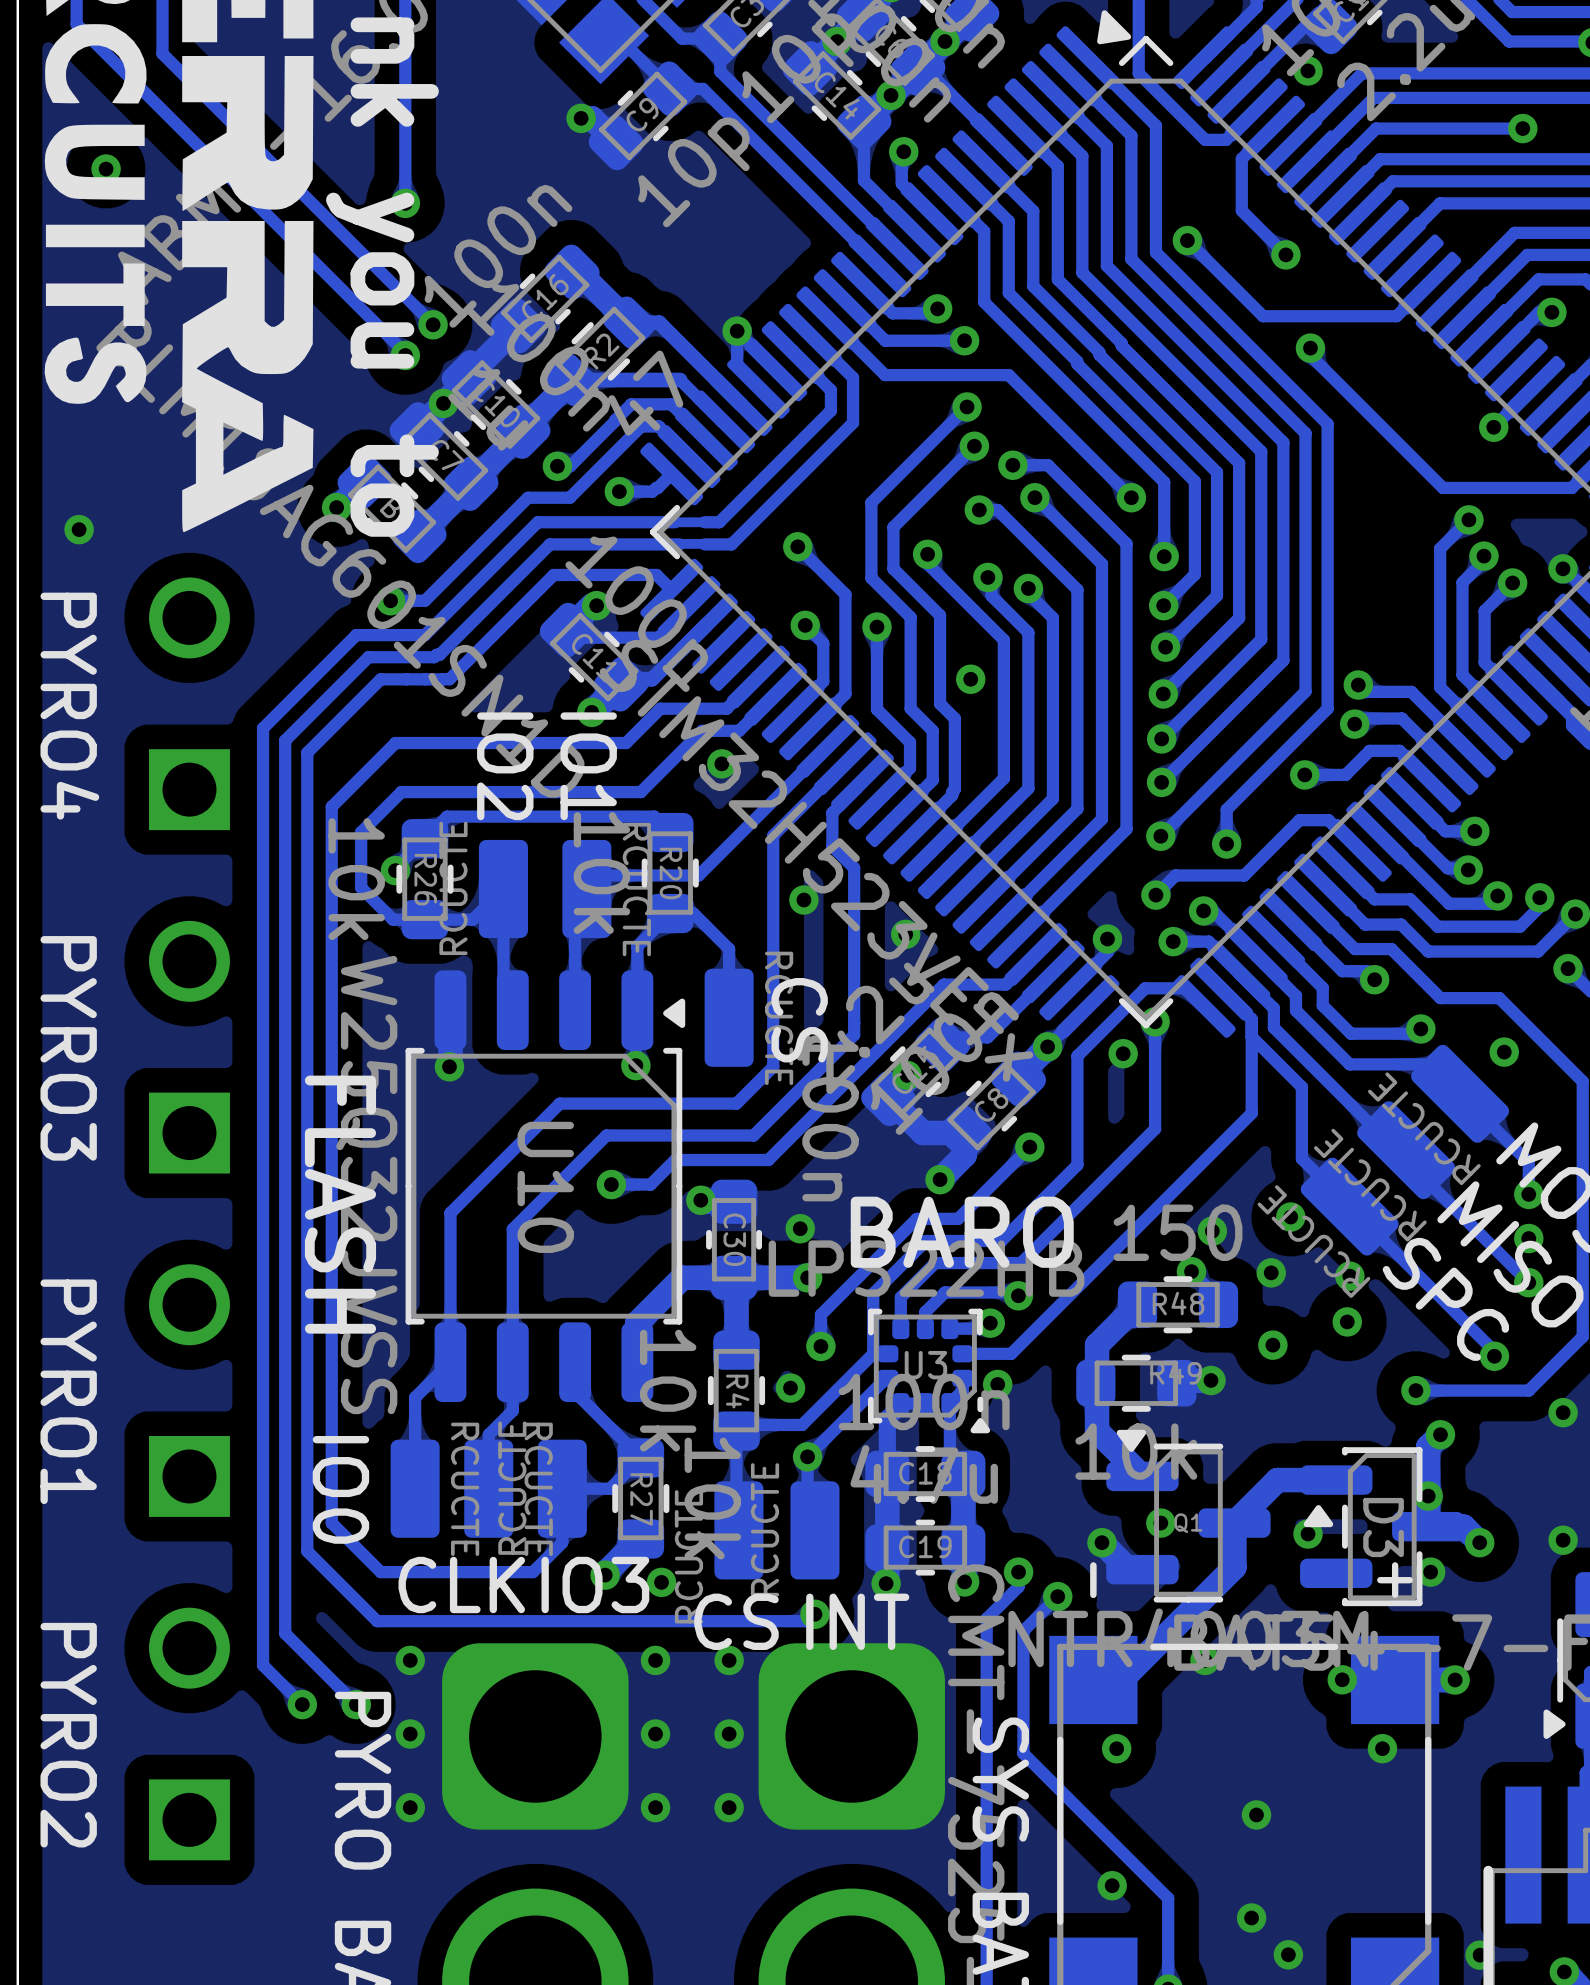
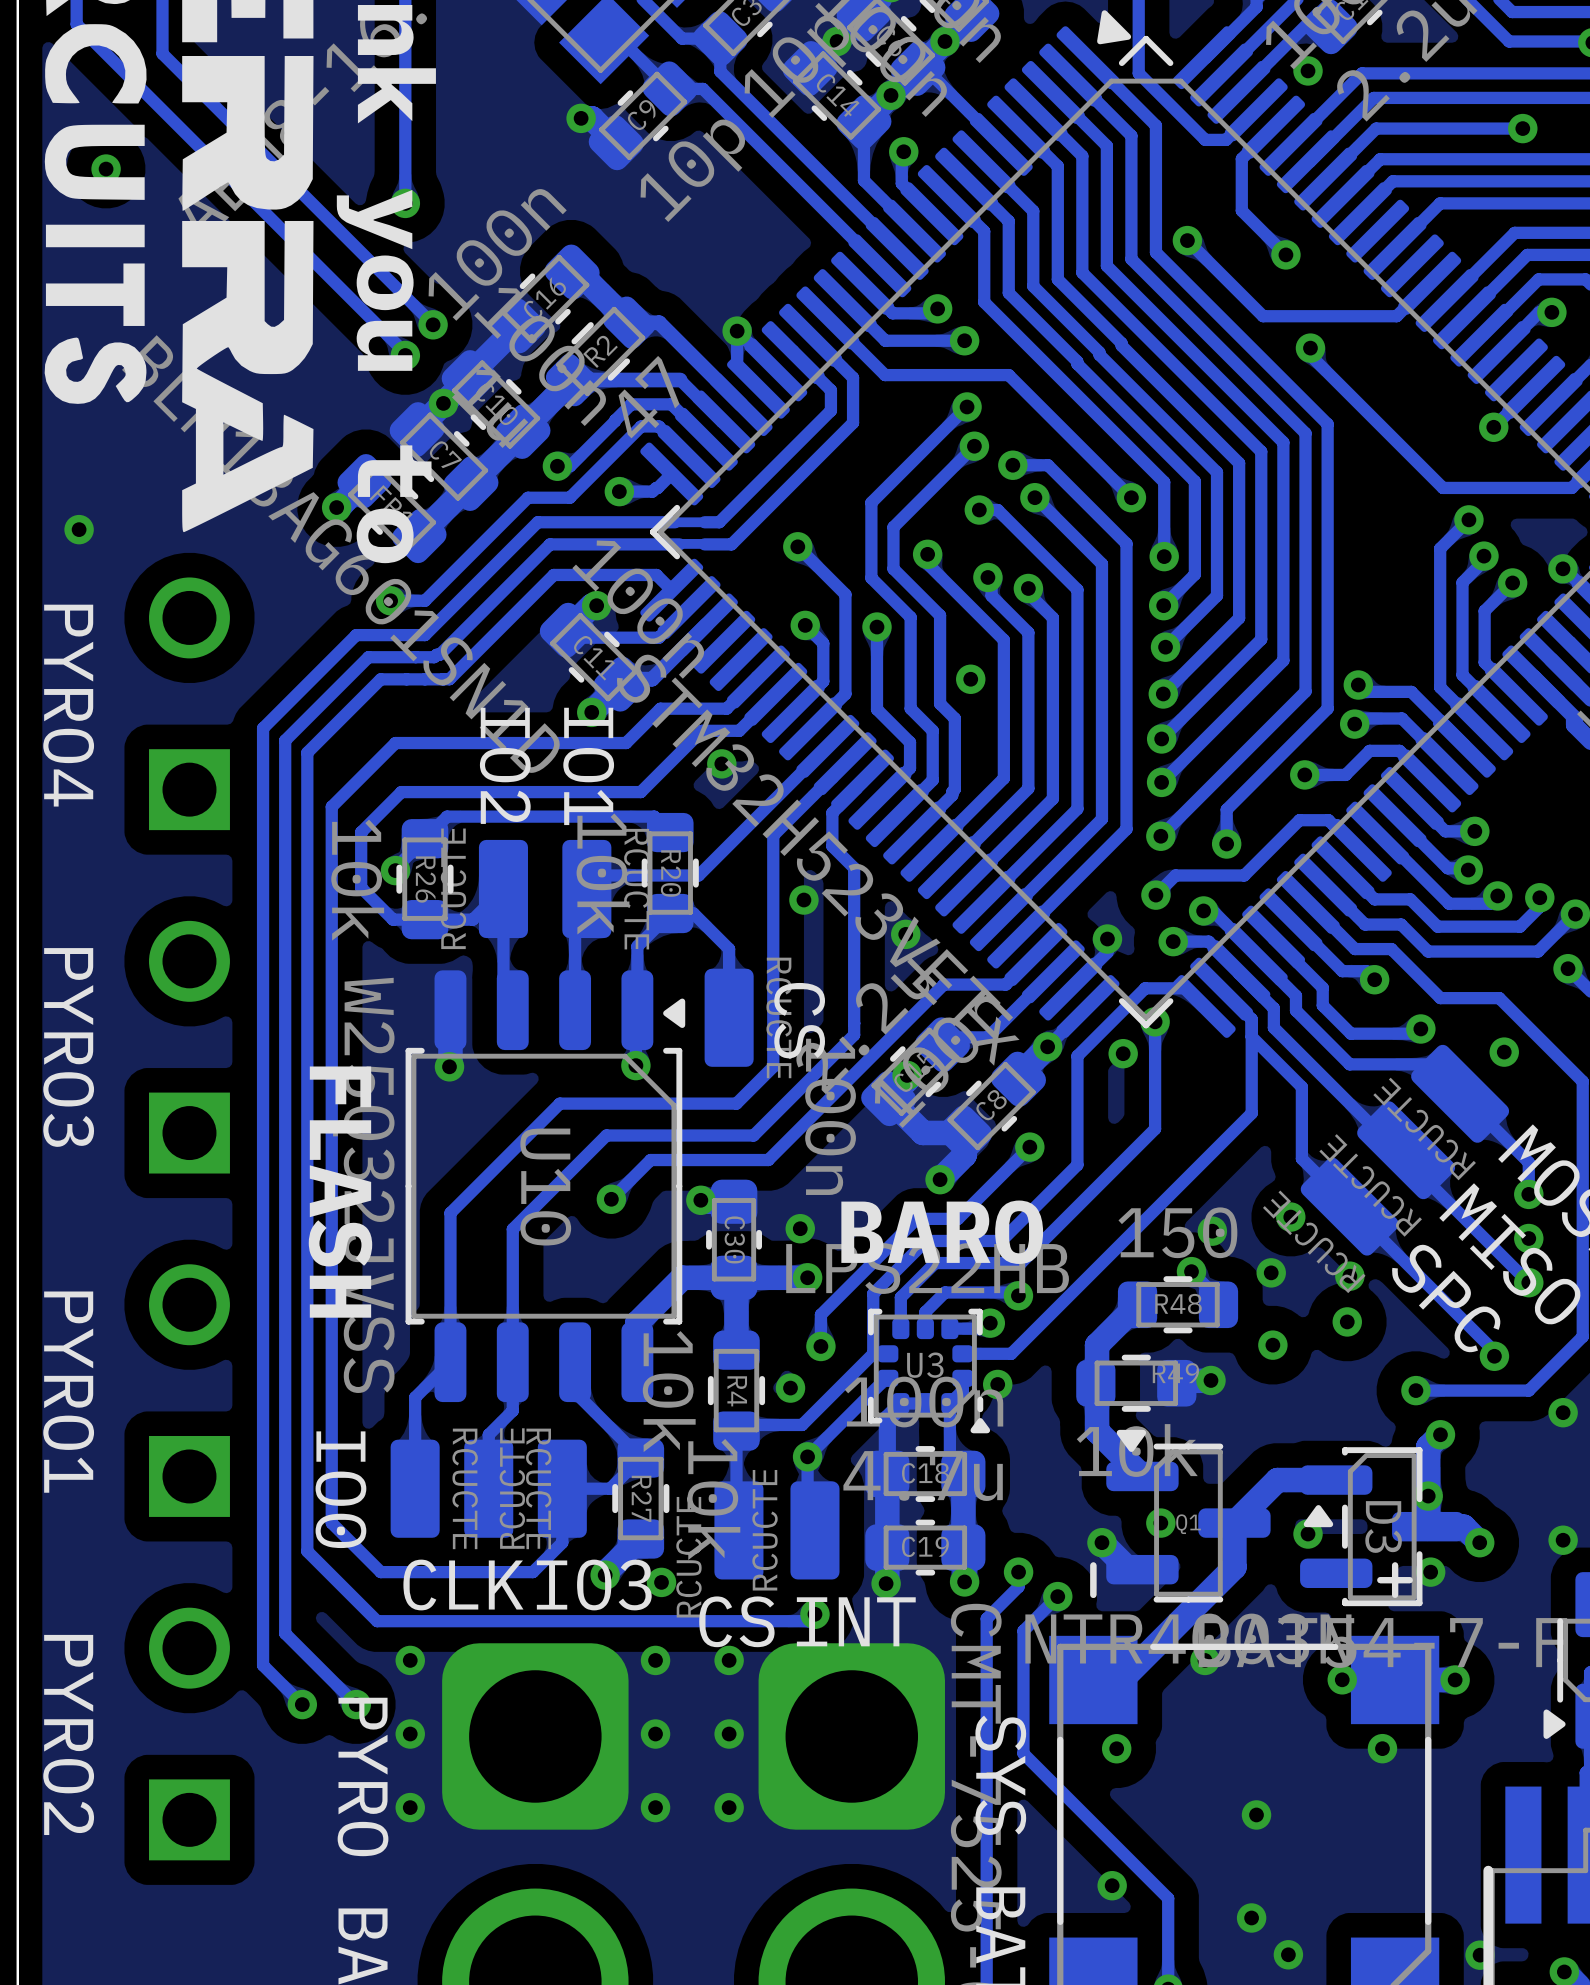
track: (675, 1160) (650, 1184) (611, 1184) -> (675, 1160) (650, 1160) (611, 1199)
via position: (611, 1184) -> (611, 1199)

